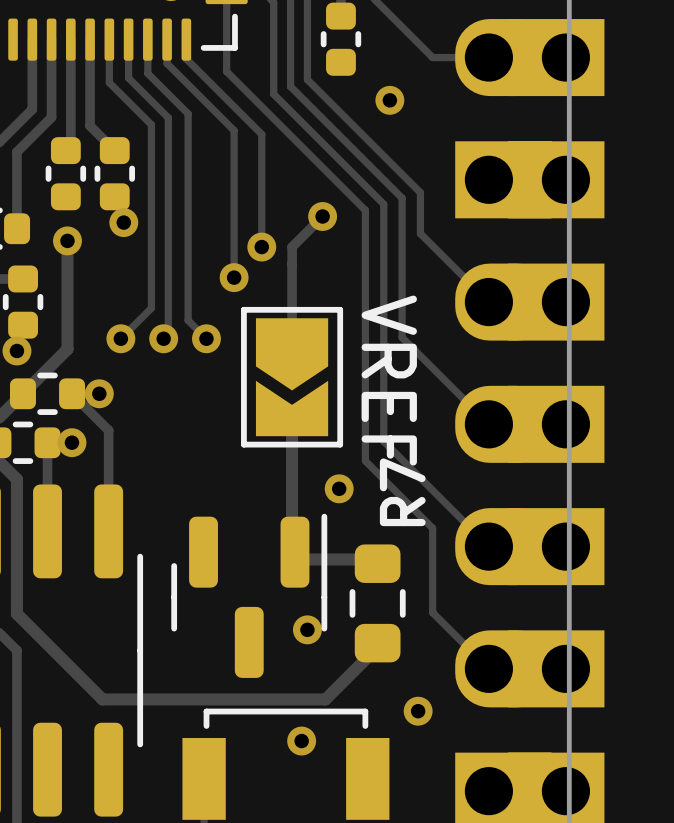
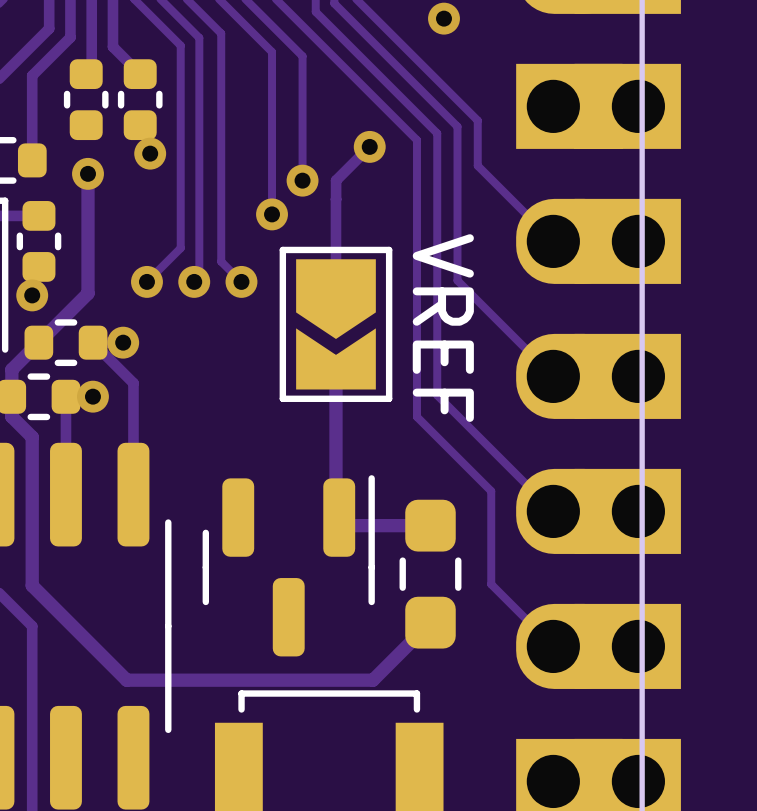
via: (339, 488) -> none
R7: (377, 603) -> none
part: none -> (430, 574)
via: (307, 629) -> none
via: (418, 711) -> none
via: (301, 741) -> none

